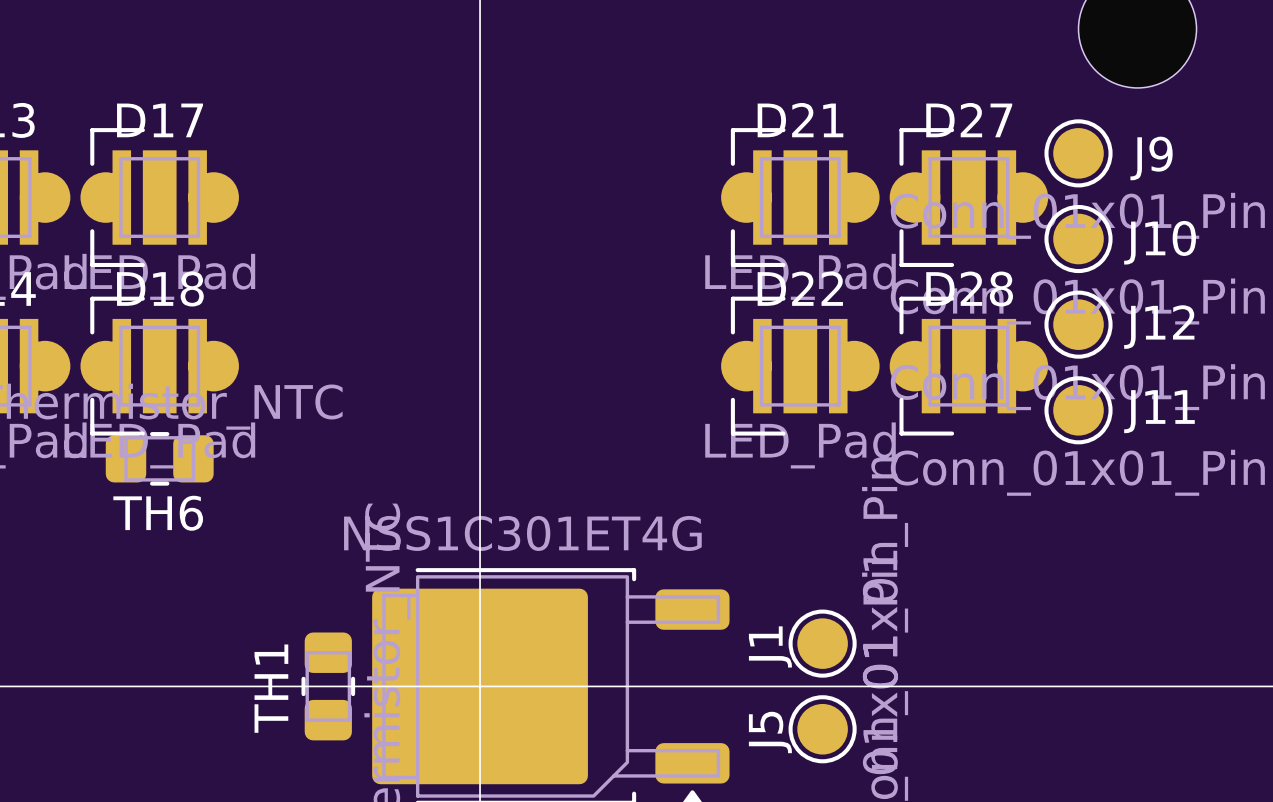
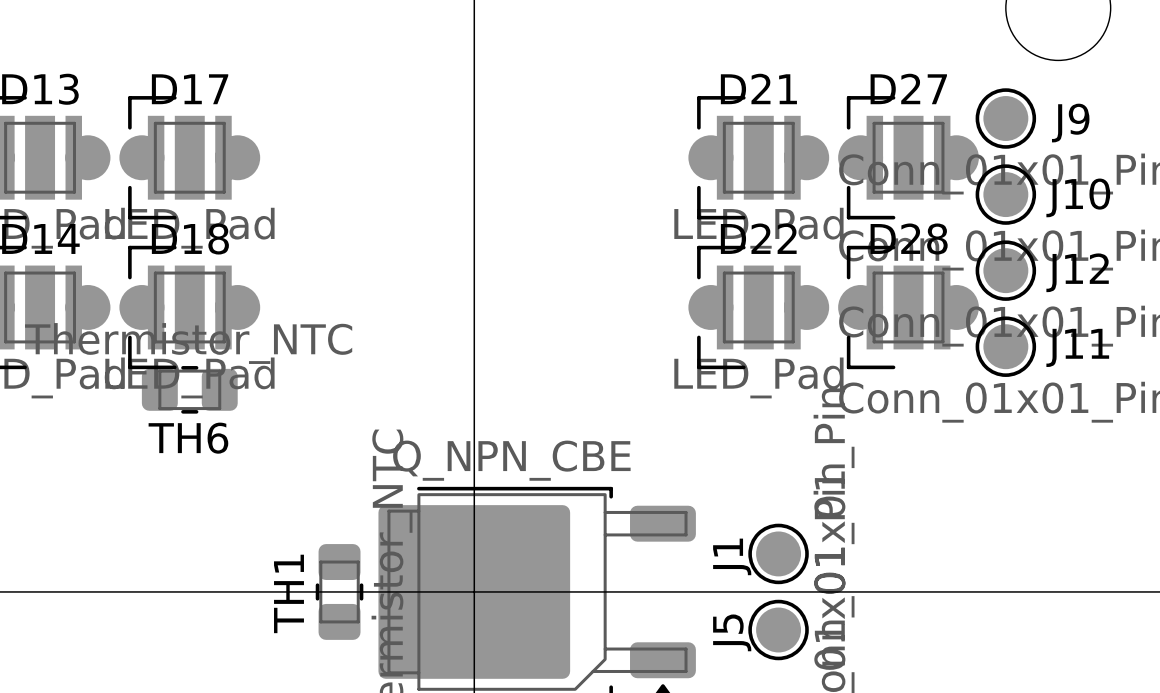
part value: NSS1C301ET4G (522, 533) -> Q_NPN_CBE (511, 460)

